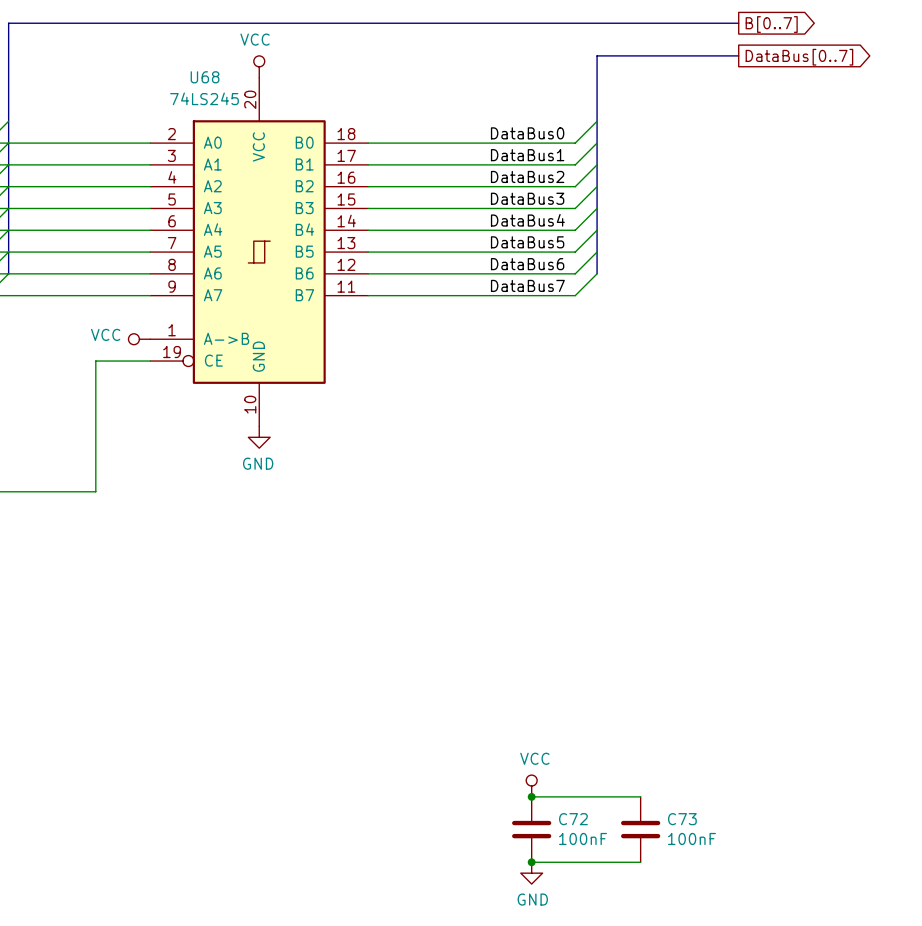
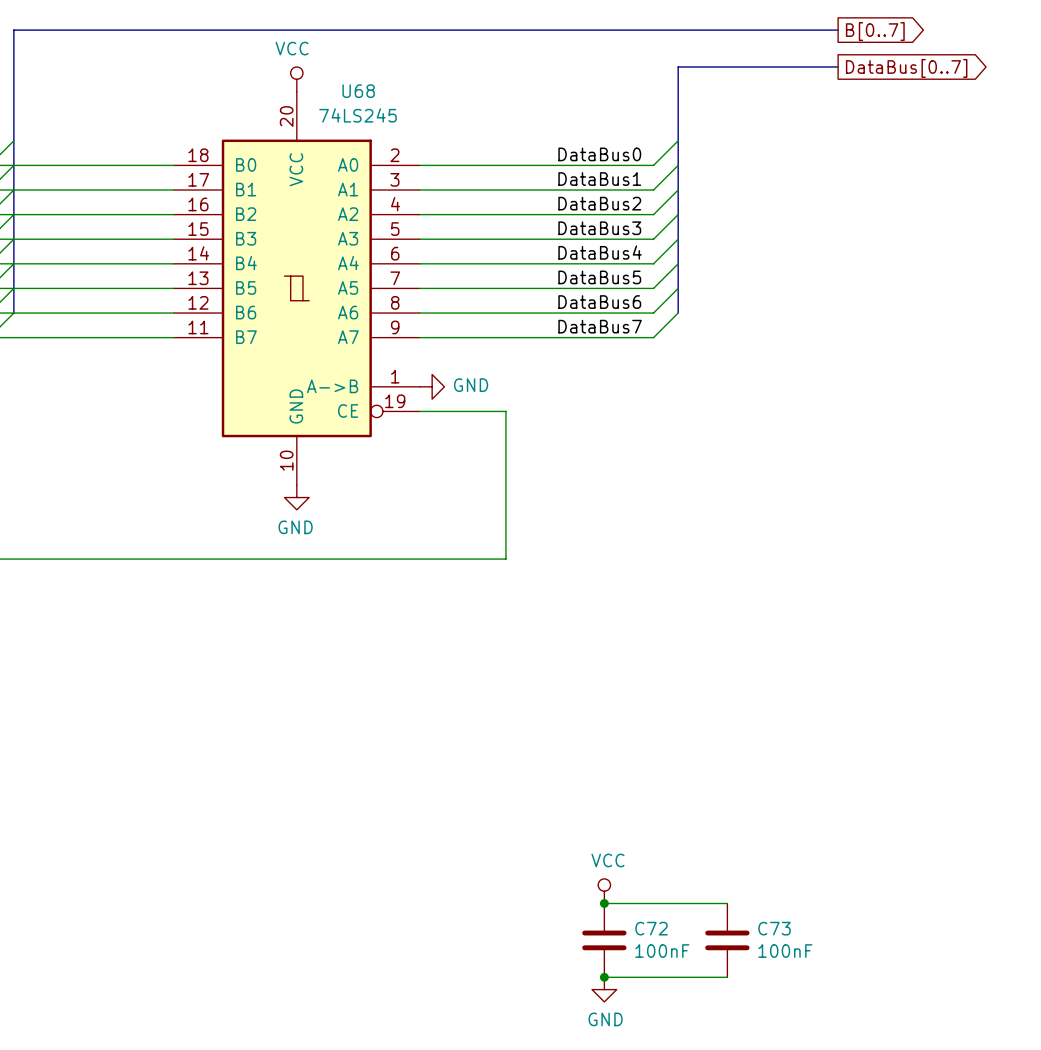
U68 flip: as is (259, 252) -> left-right (296, 288)
power symbol: VCC (139, 339) -> none
power symbol: none -> GND (432, 386)
wire: (150, 361) (95, 361) (95, 491) -> (419, 411) (505, 411) (505, 559) (112, 559)

